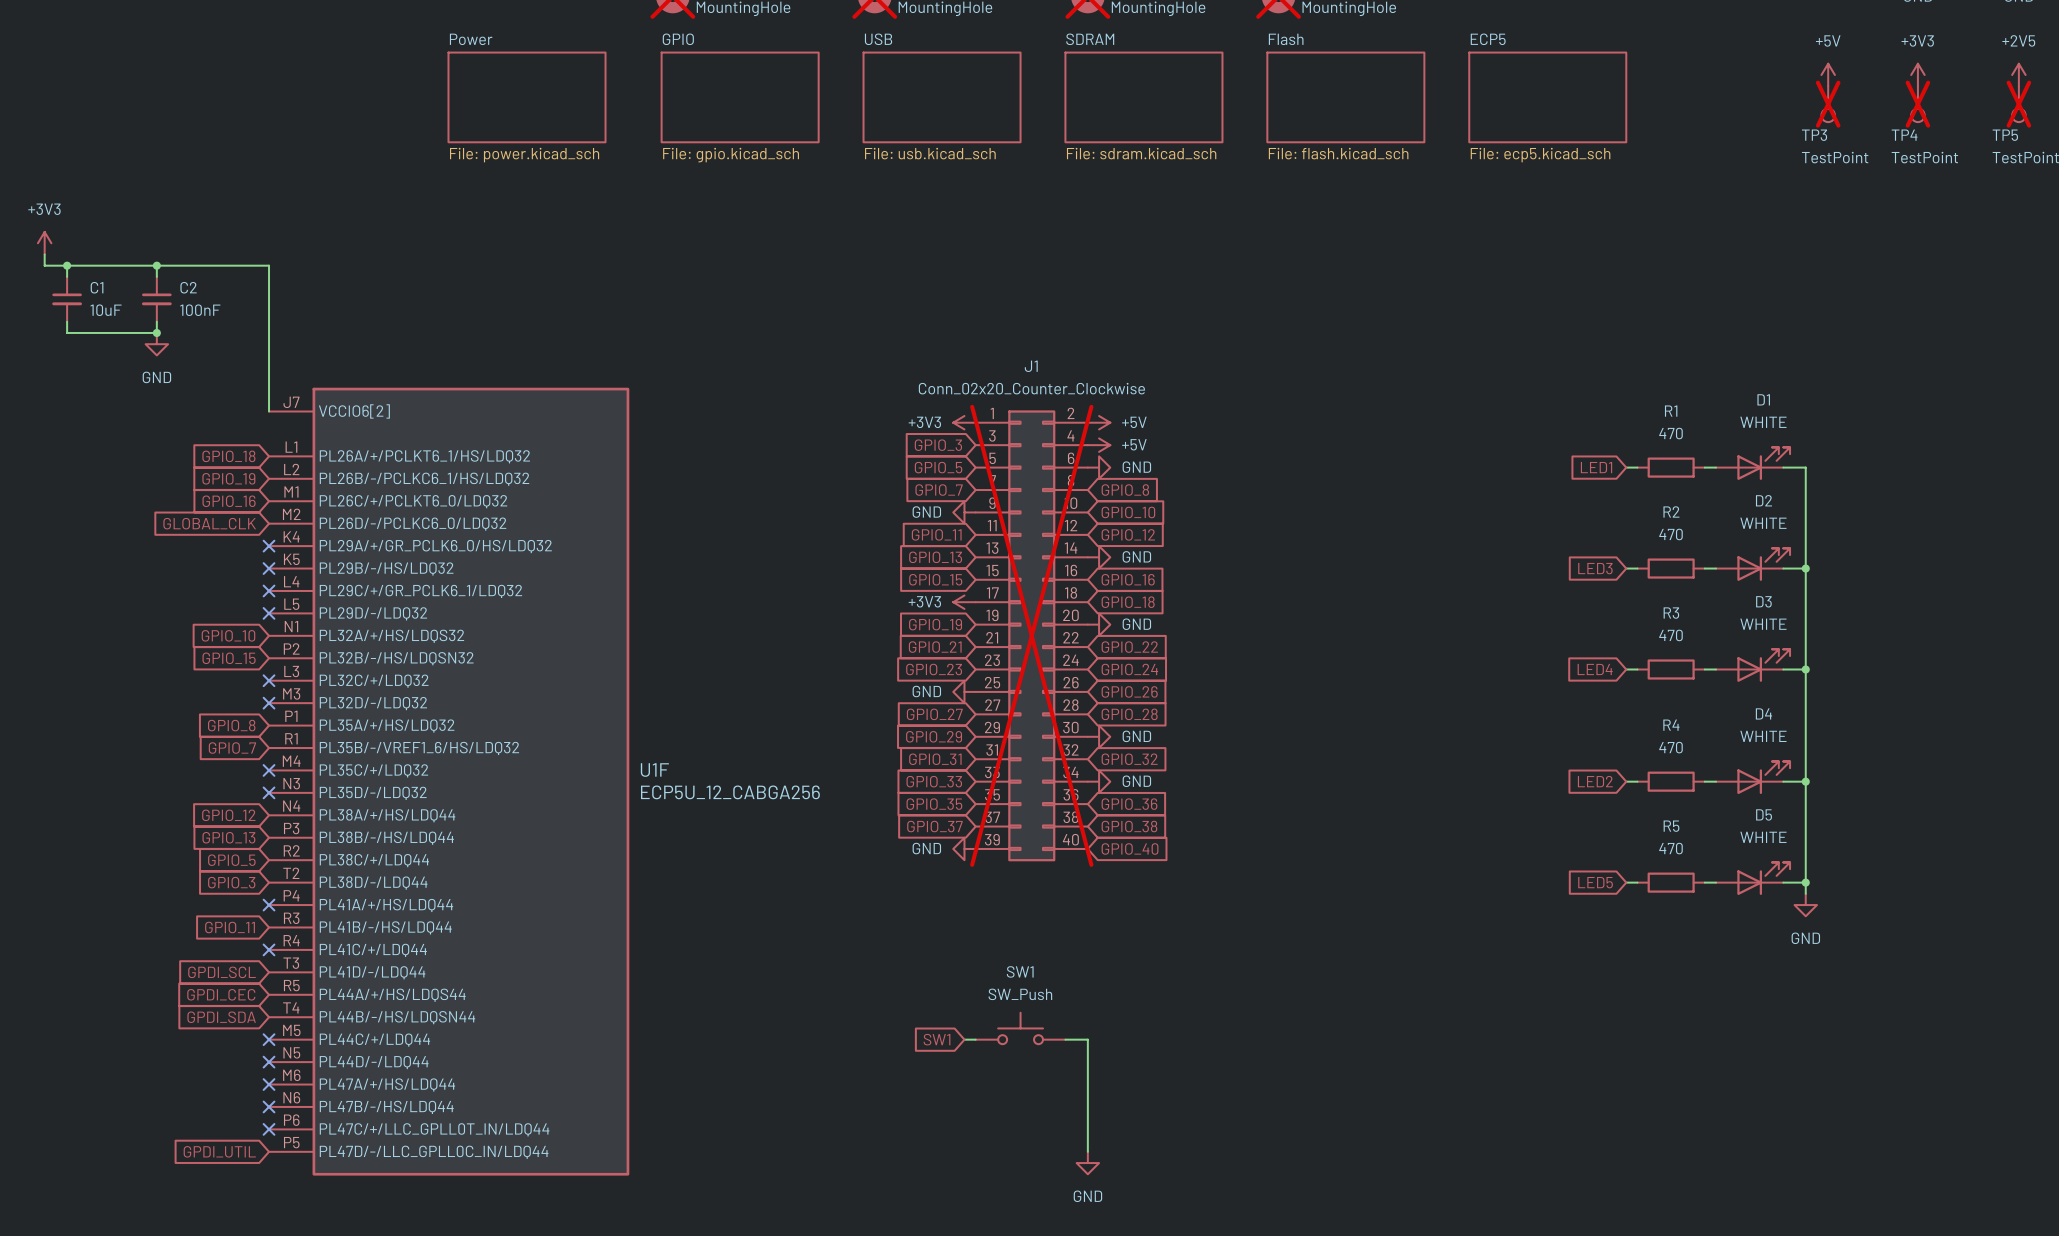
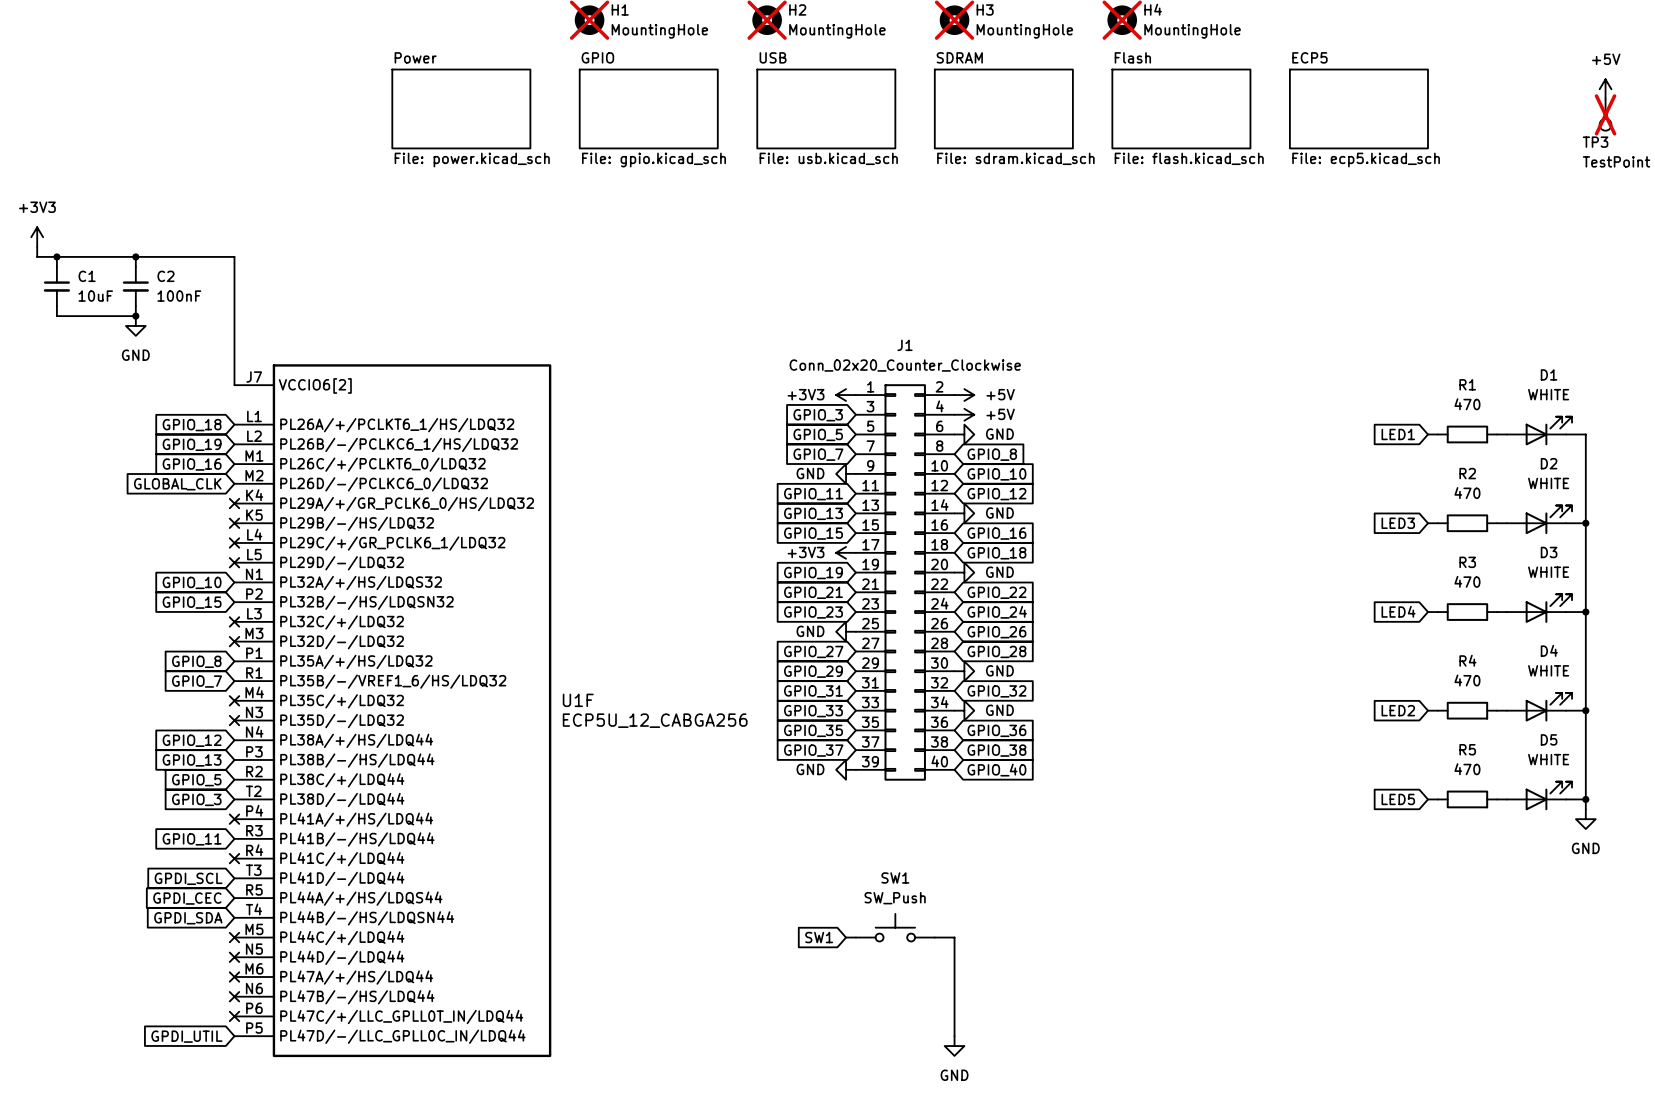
J1 do-not-place cross: (1031, 635) -> none

